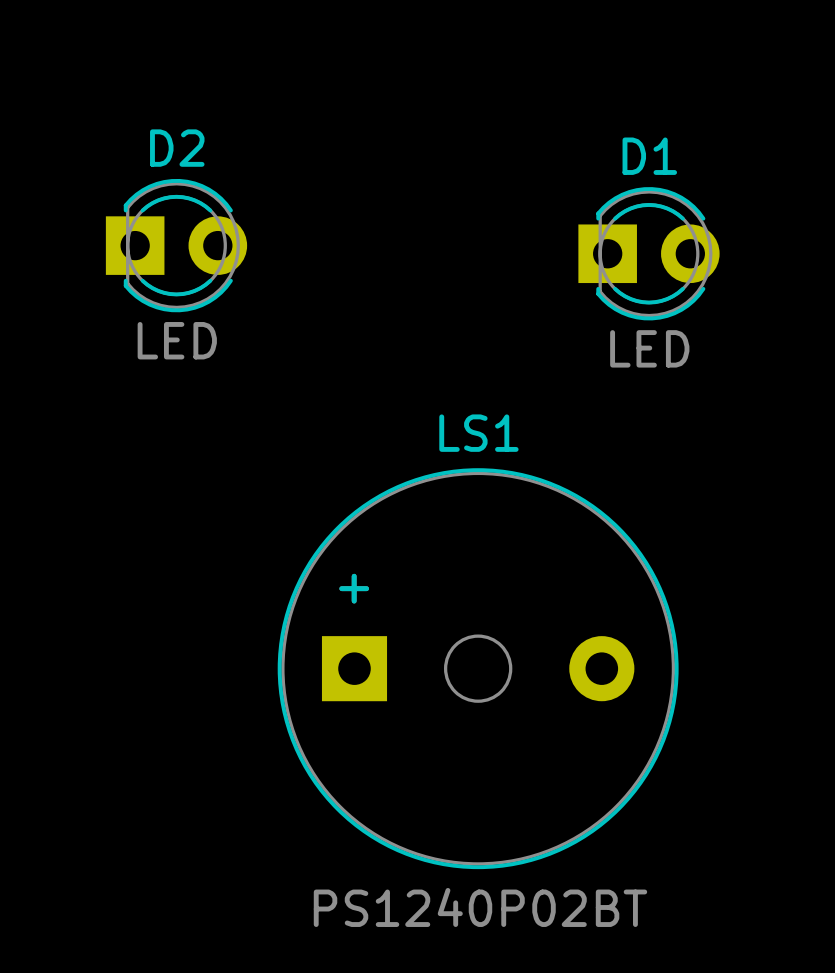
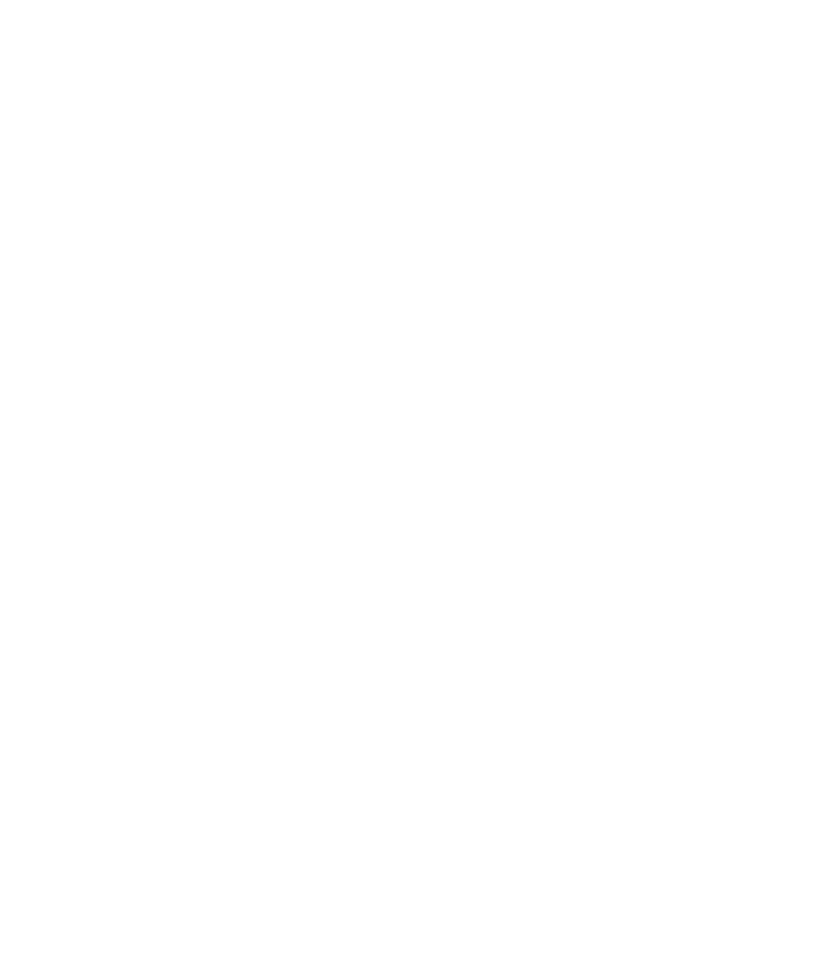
D2: LED (176, 245) -> none
D1: LED (649, 253) -> none
LS1: PS1240P02BT (478, 668) -> none

